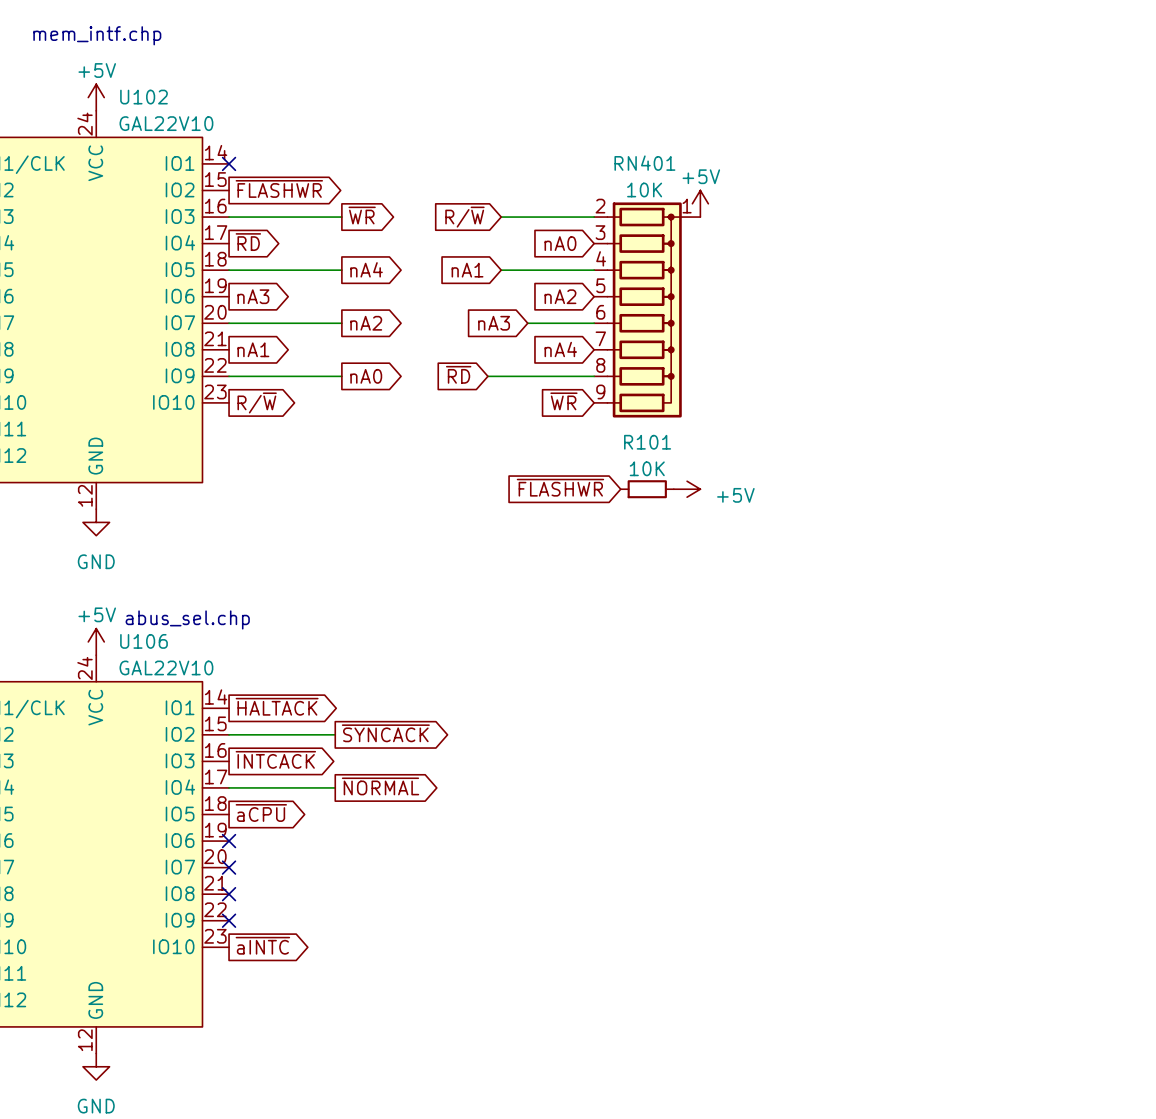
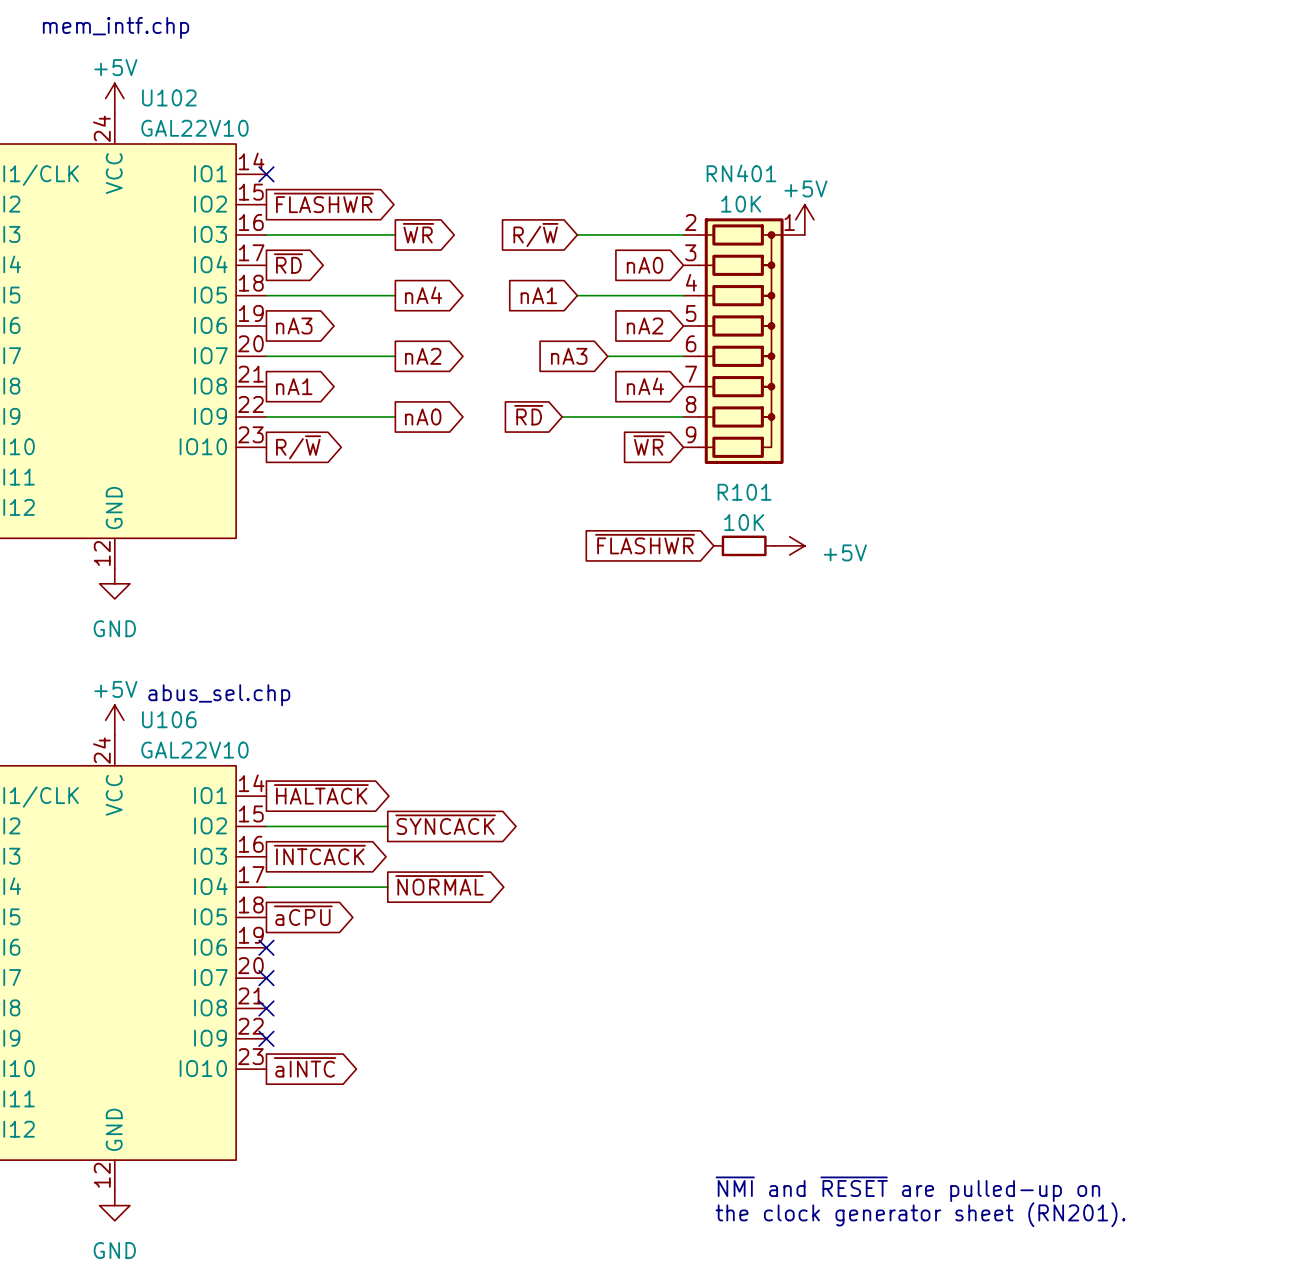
text: none -> ~{NMI} and ~{RESET} are pulled-up on (907, 1189)
text: none -> the clock generator sheet (RN201). (920, 1214)

